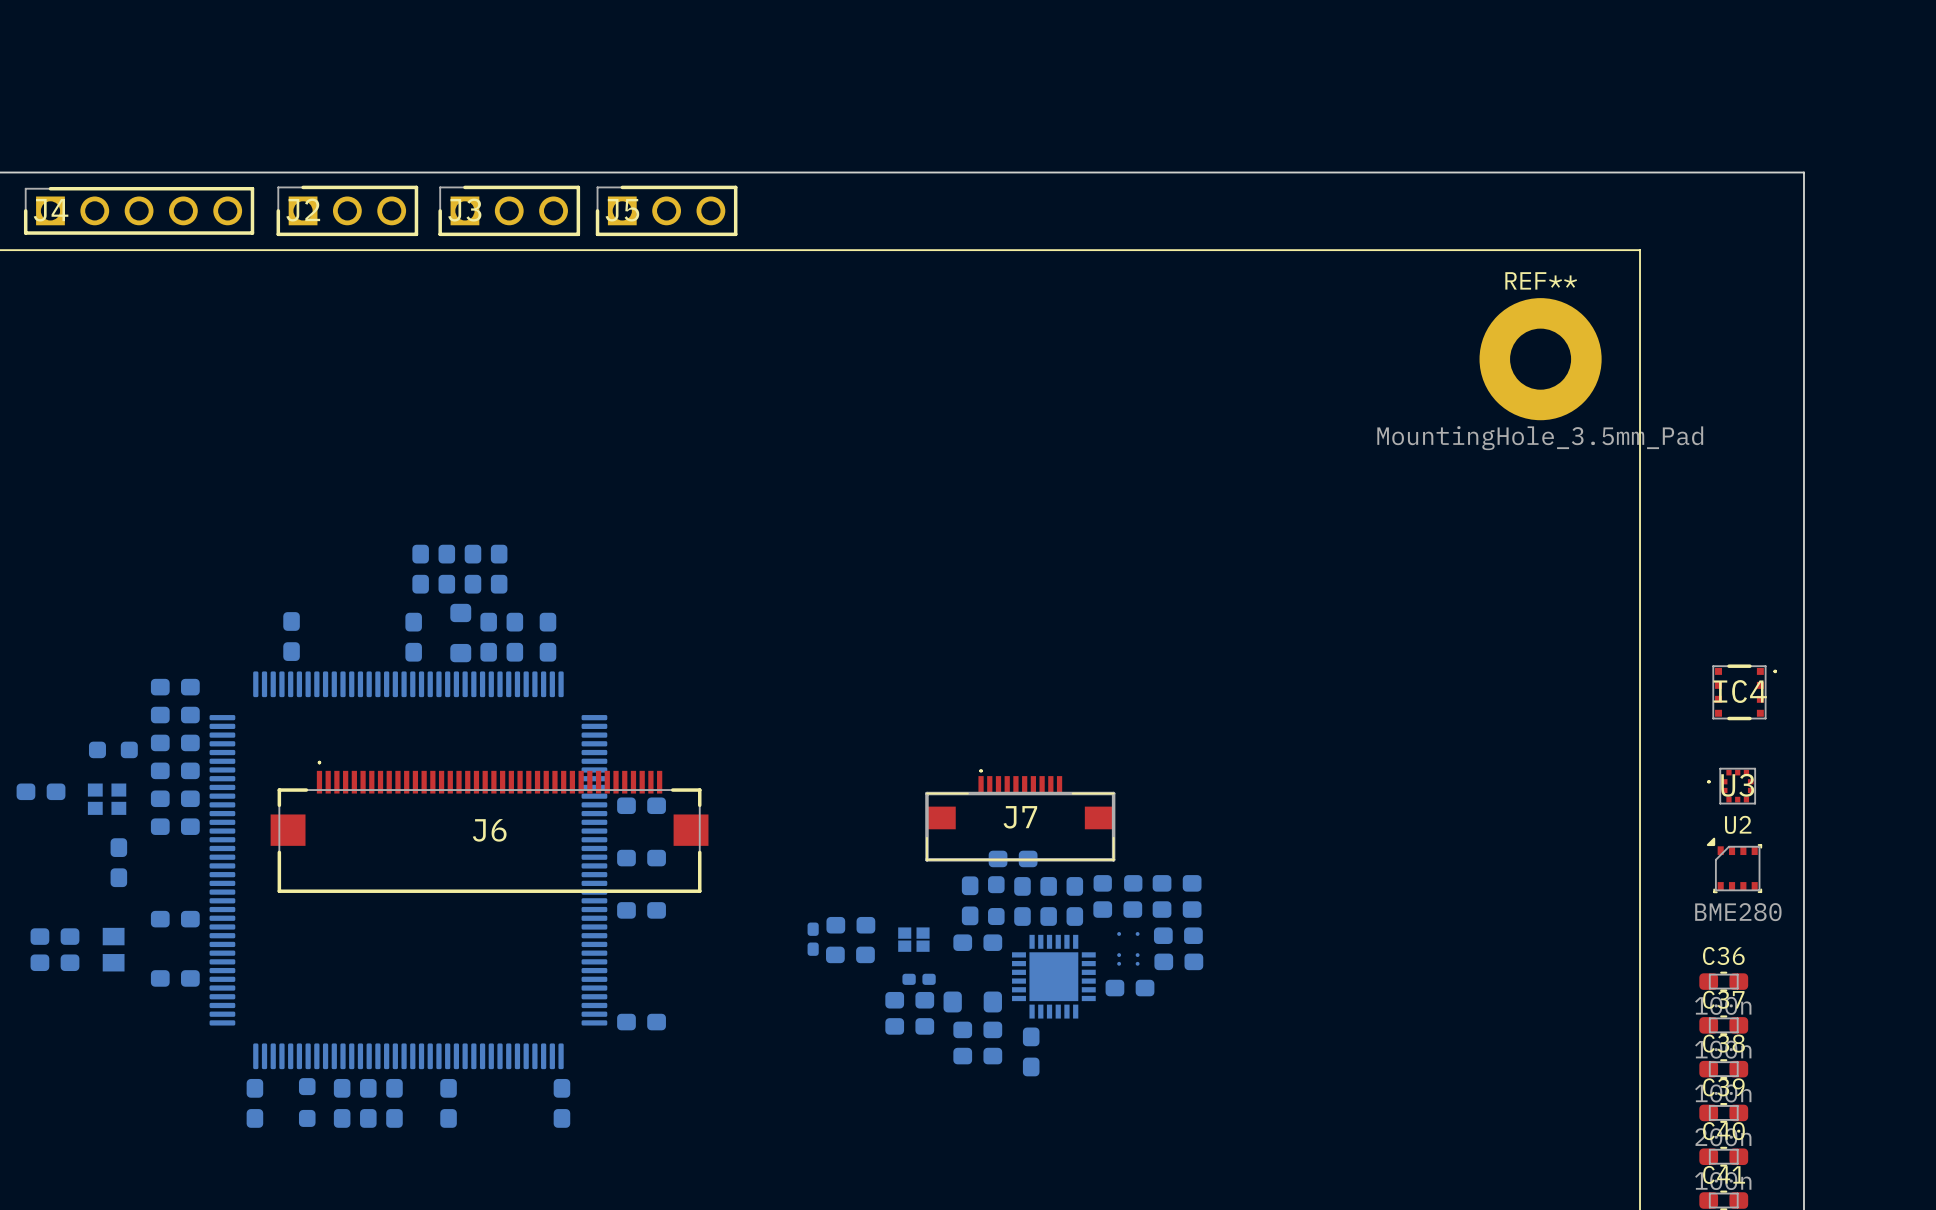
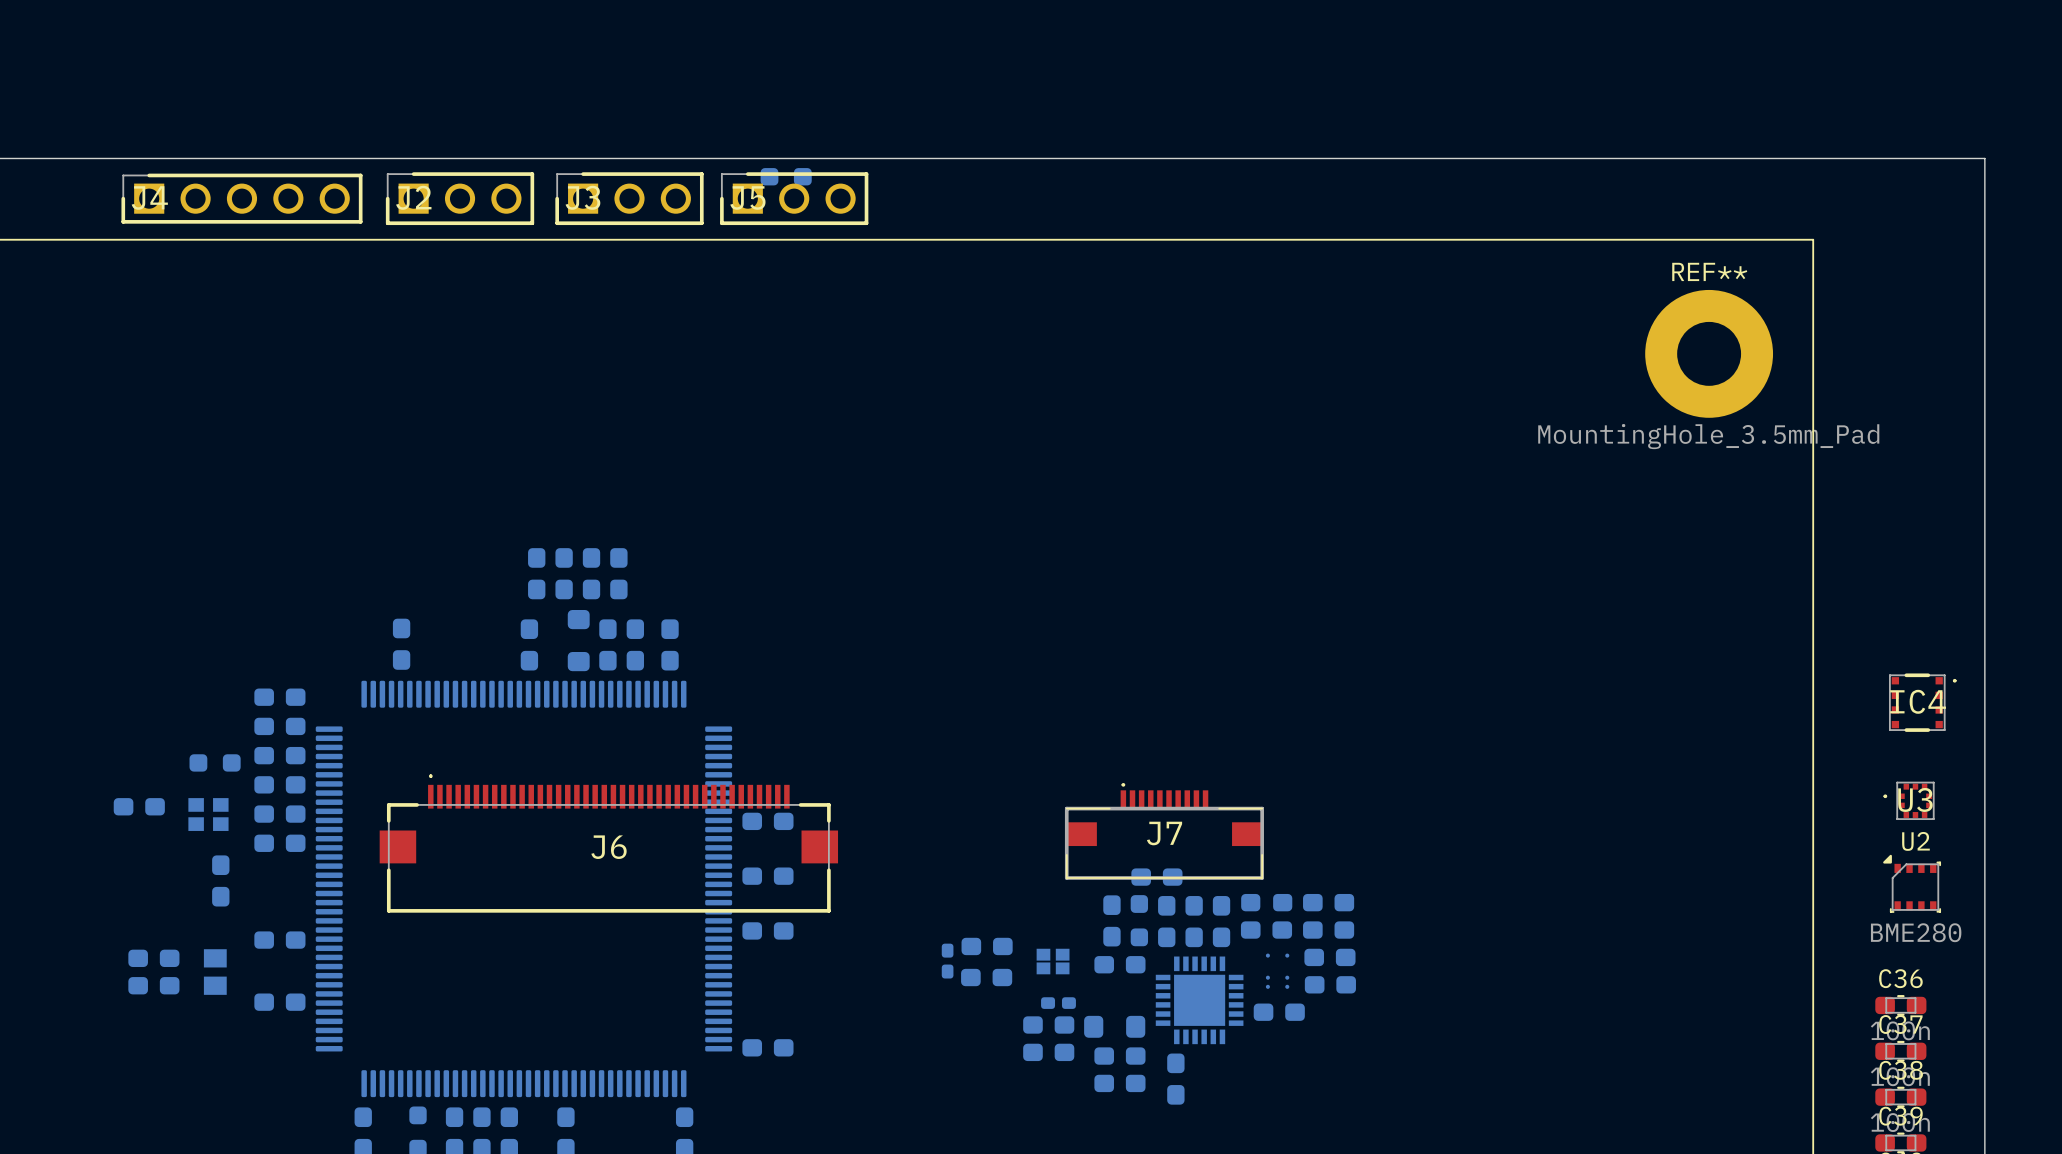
part: none -> (786, 176)

